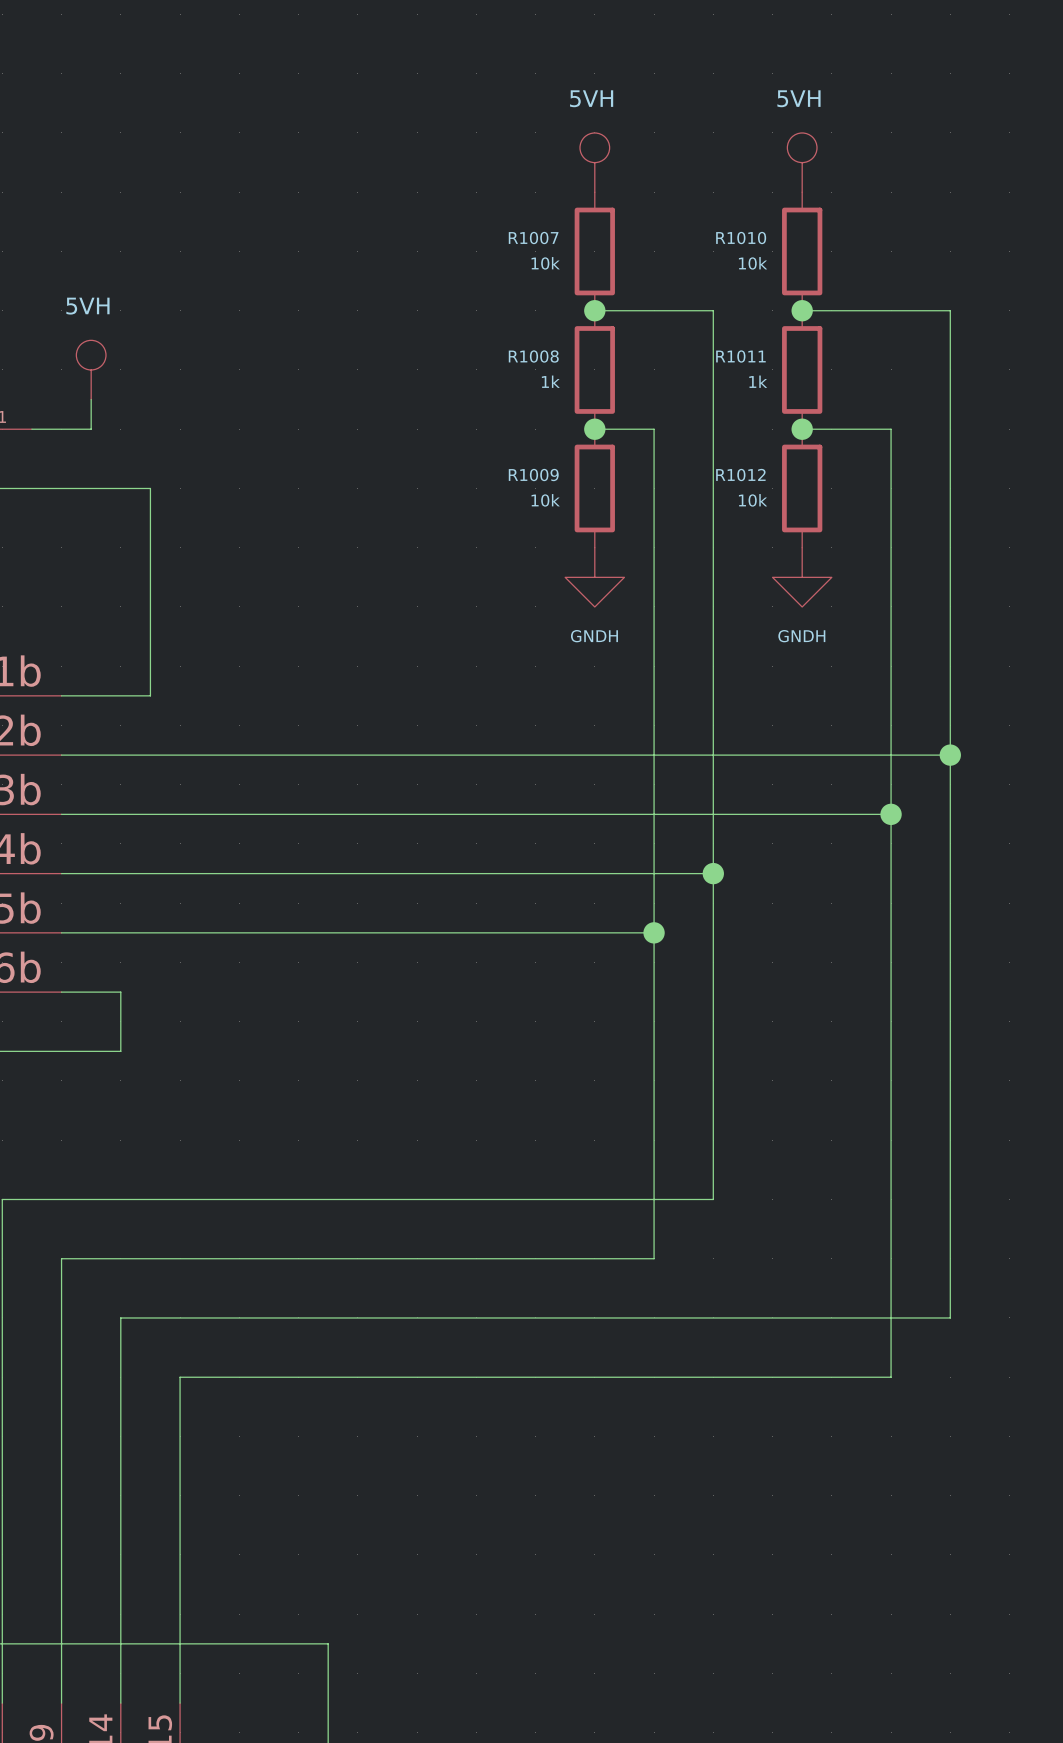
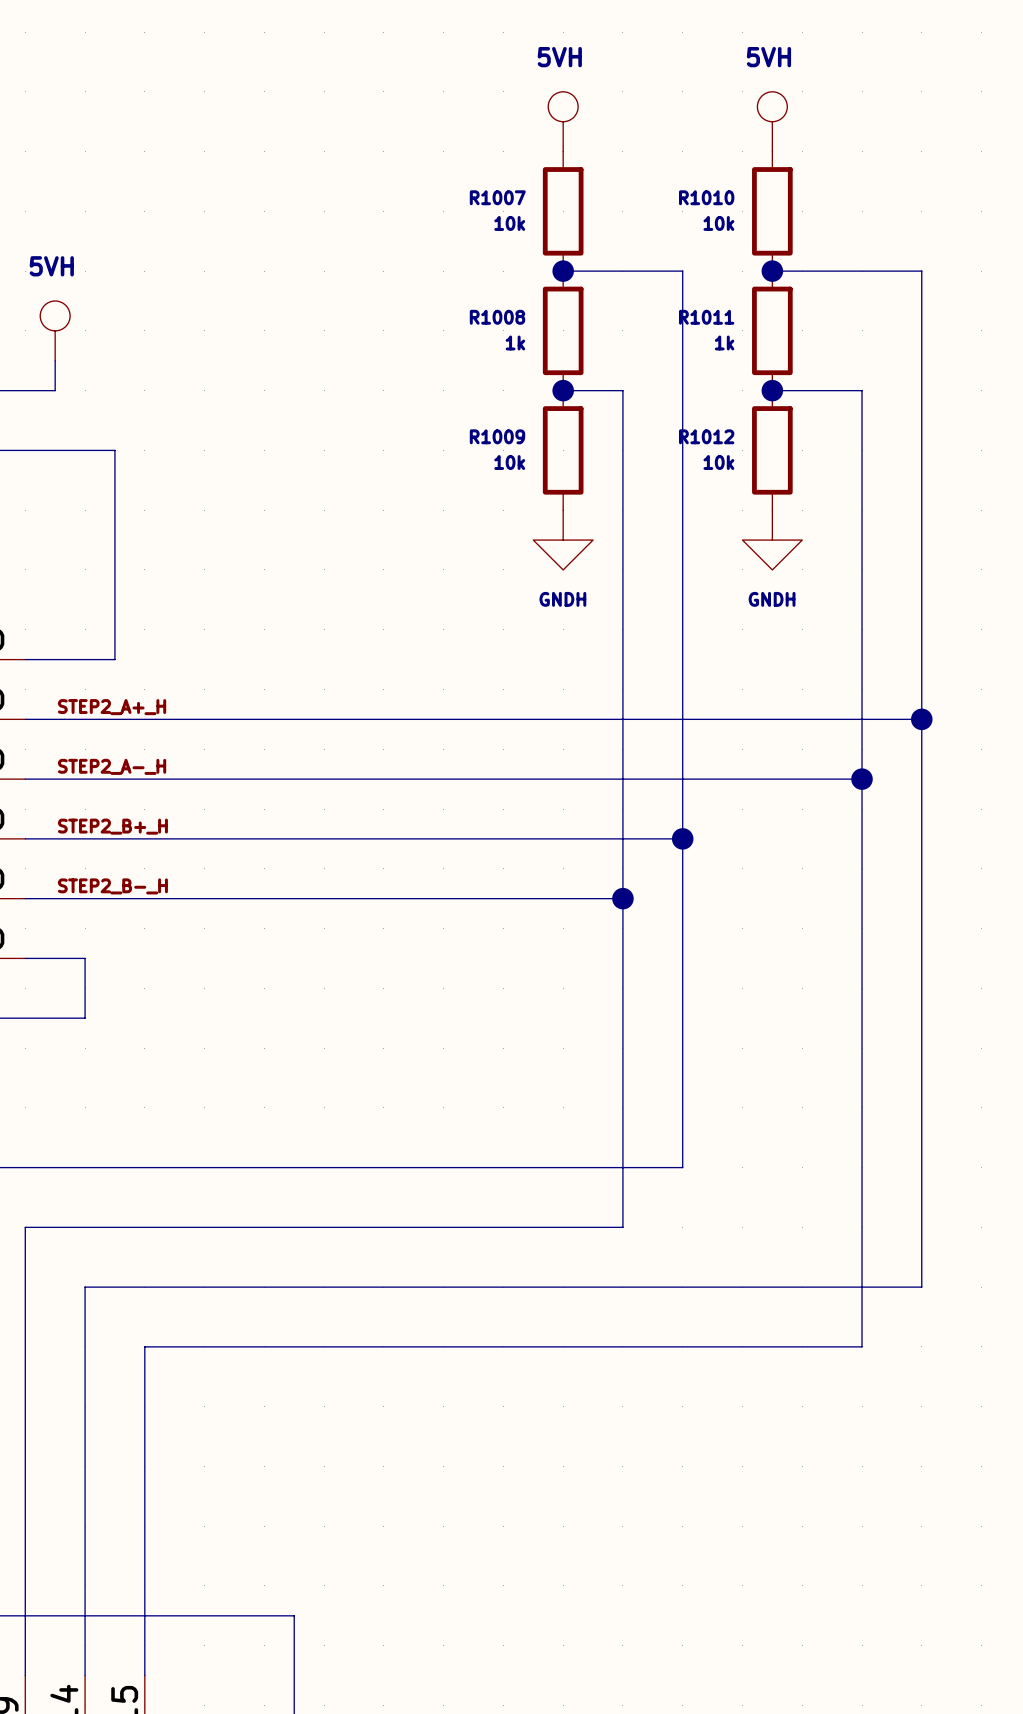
label: none -> STEP2_A+_H (112, 707)
label: none -> STEP2_A-_H (112, 766)
label: none -> STEP2_B+_H (112, 826)
label: none -> STEP2_B-_H (112, 886)

